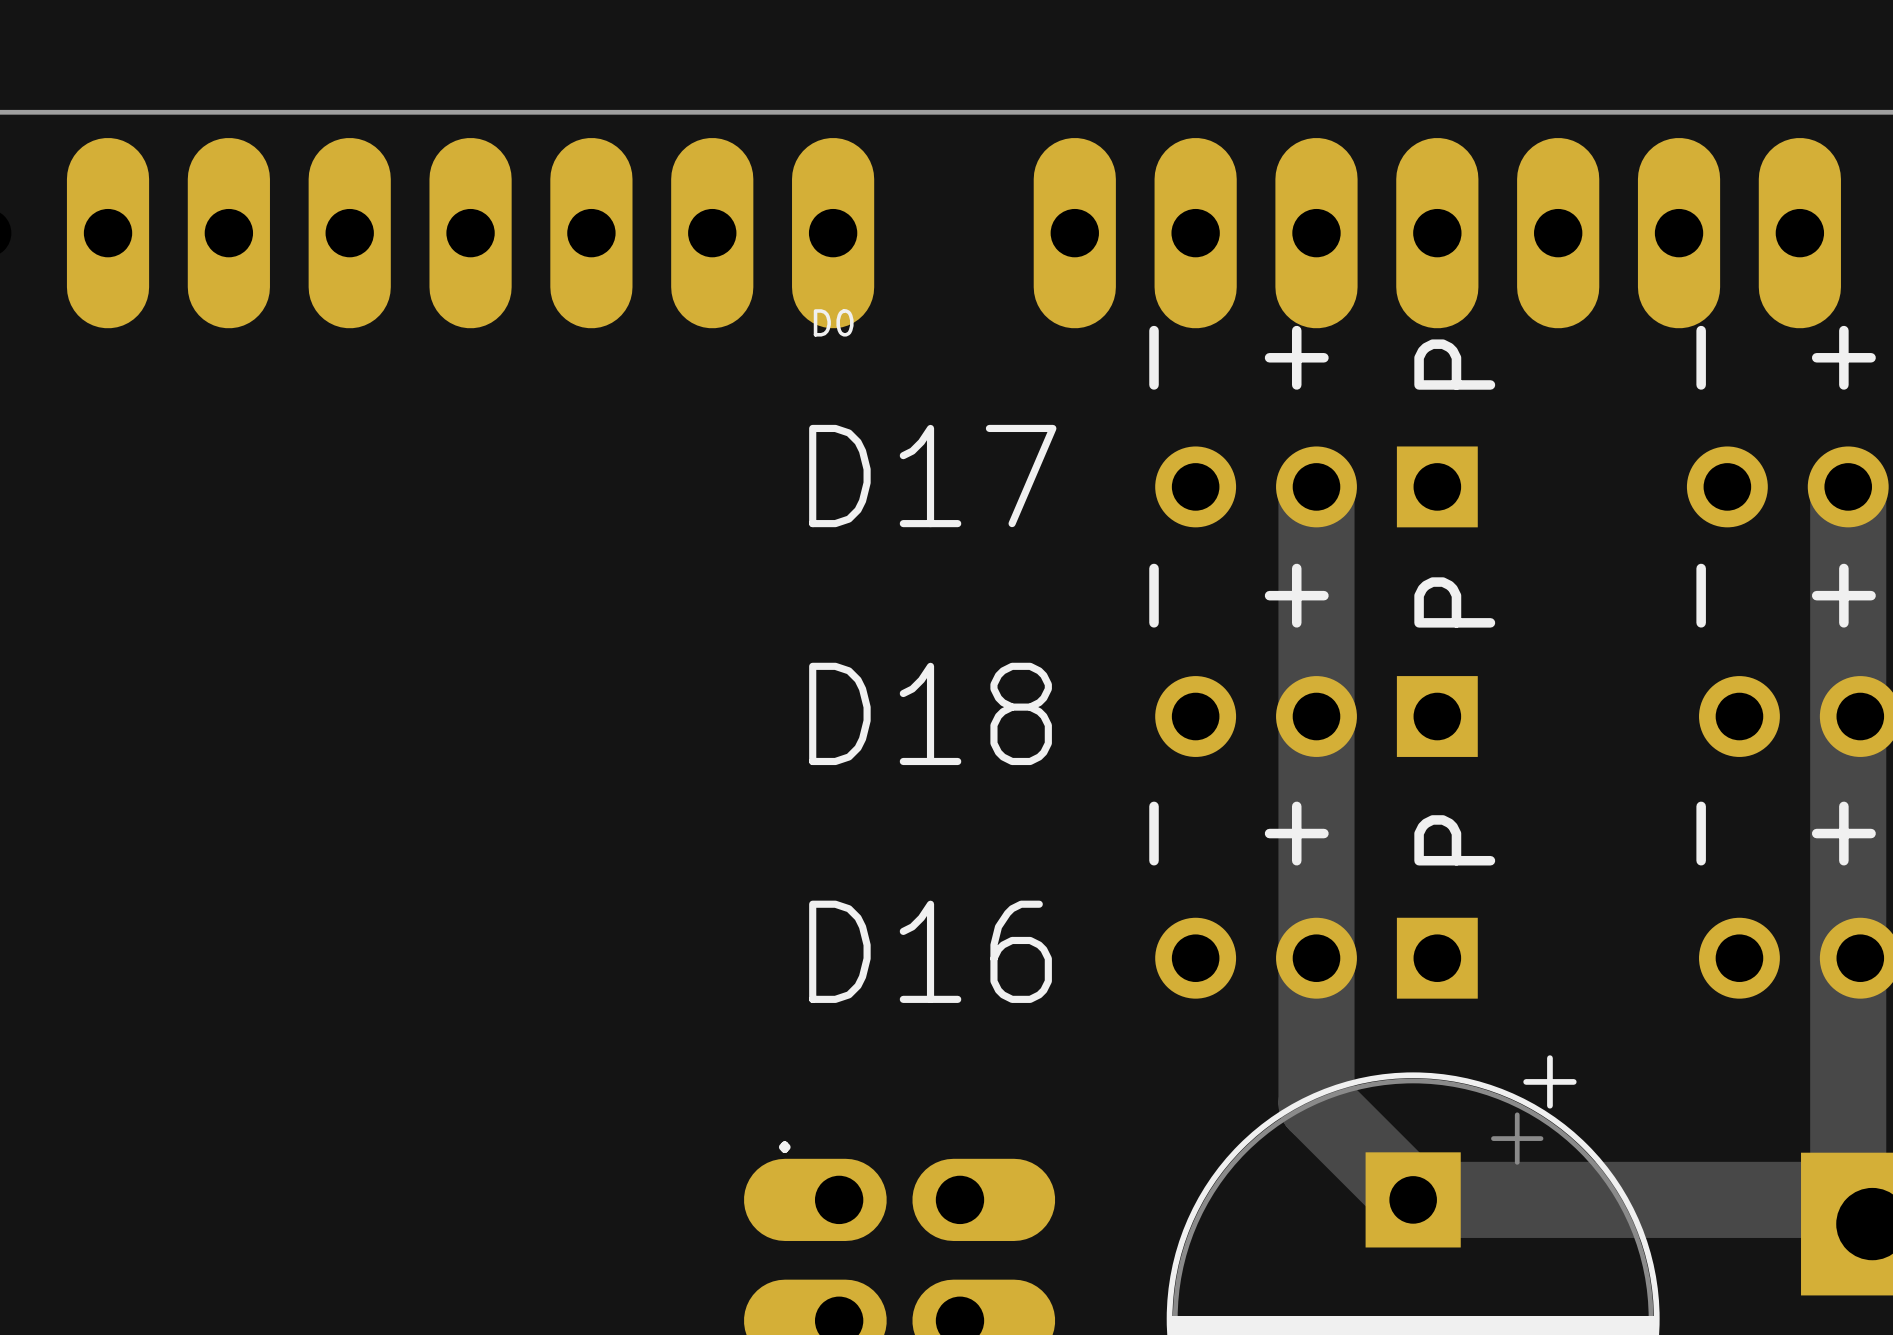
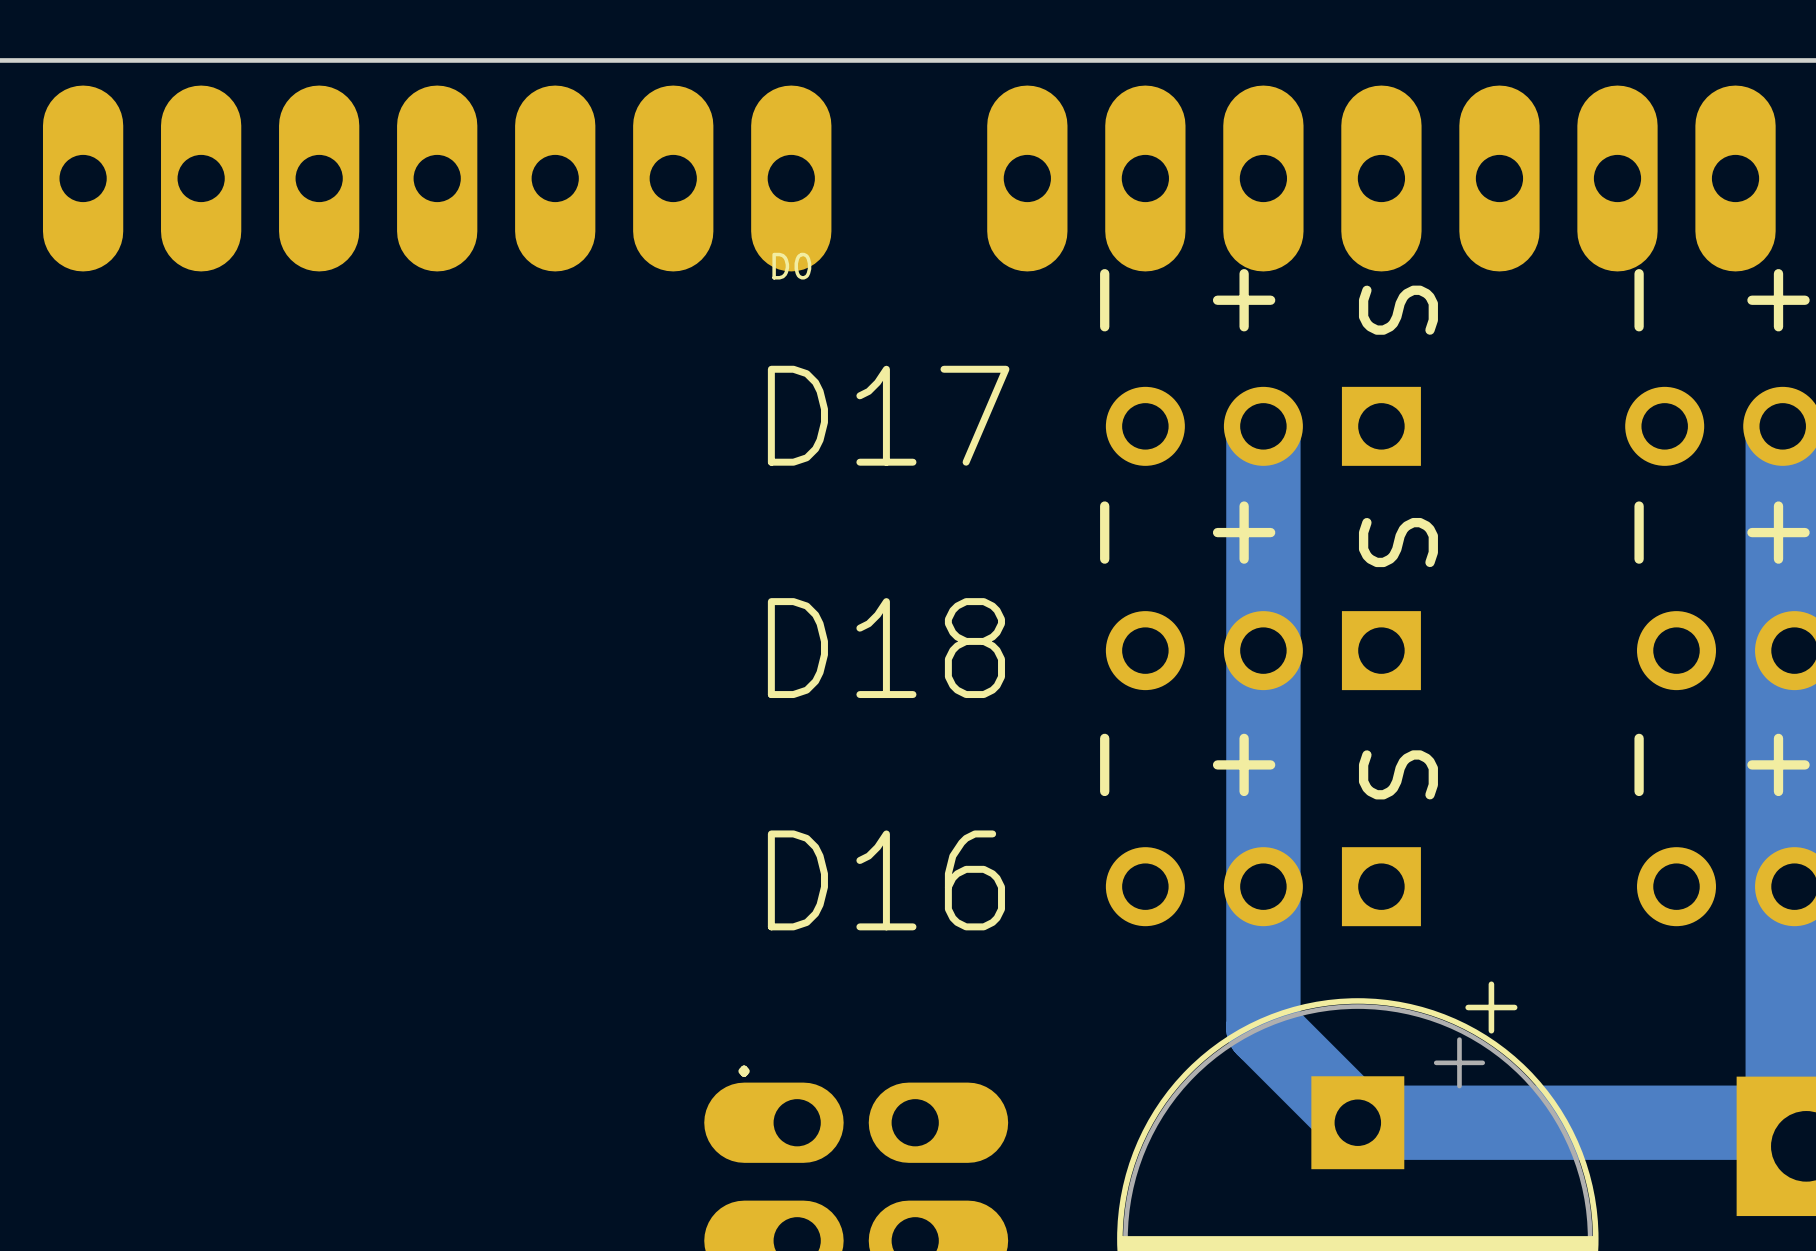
text: P (1454, 364) -> S (1398, 310)
text: P (1454, 602) -> S (1398, 542)
text: P (1454, 840) -> S (1398, 774)

